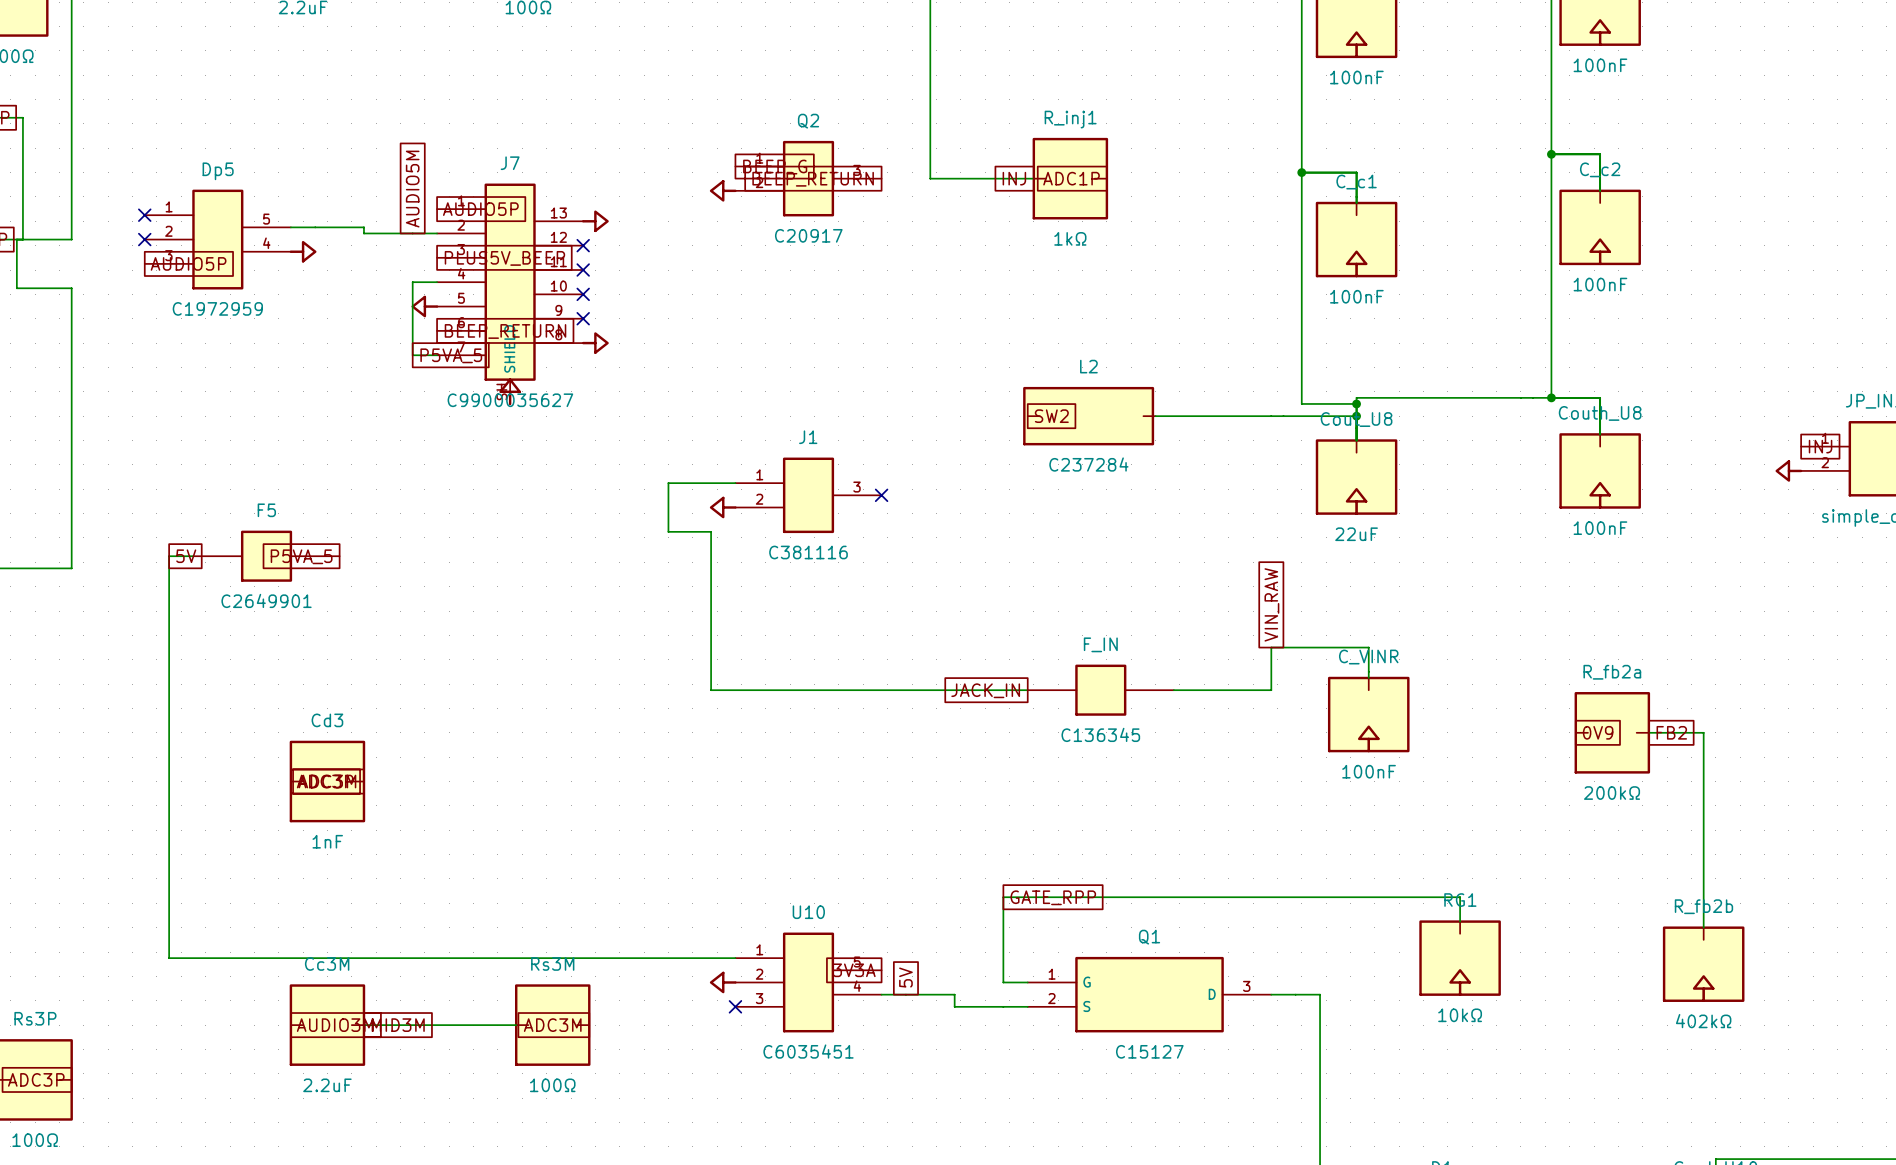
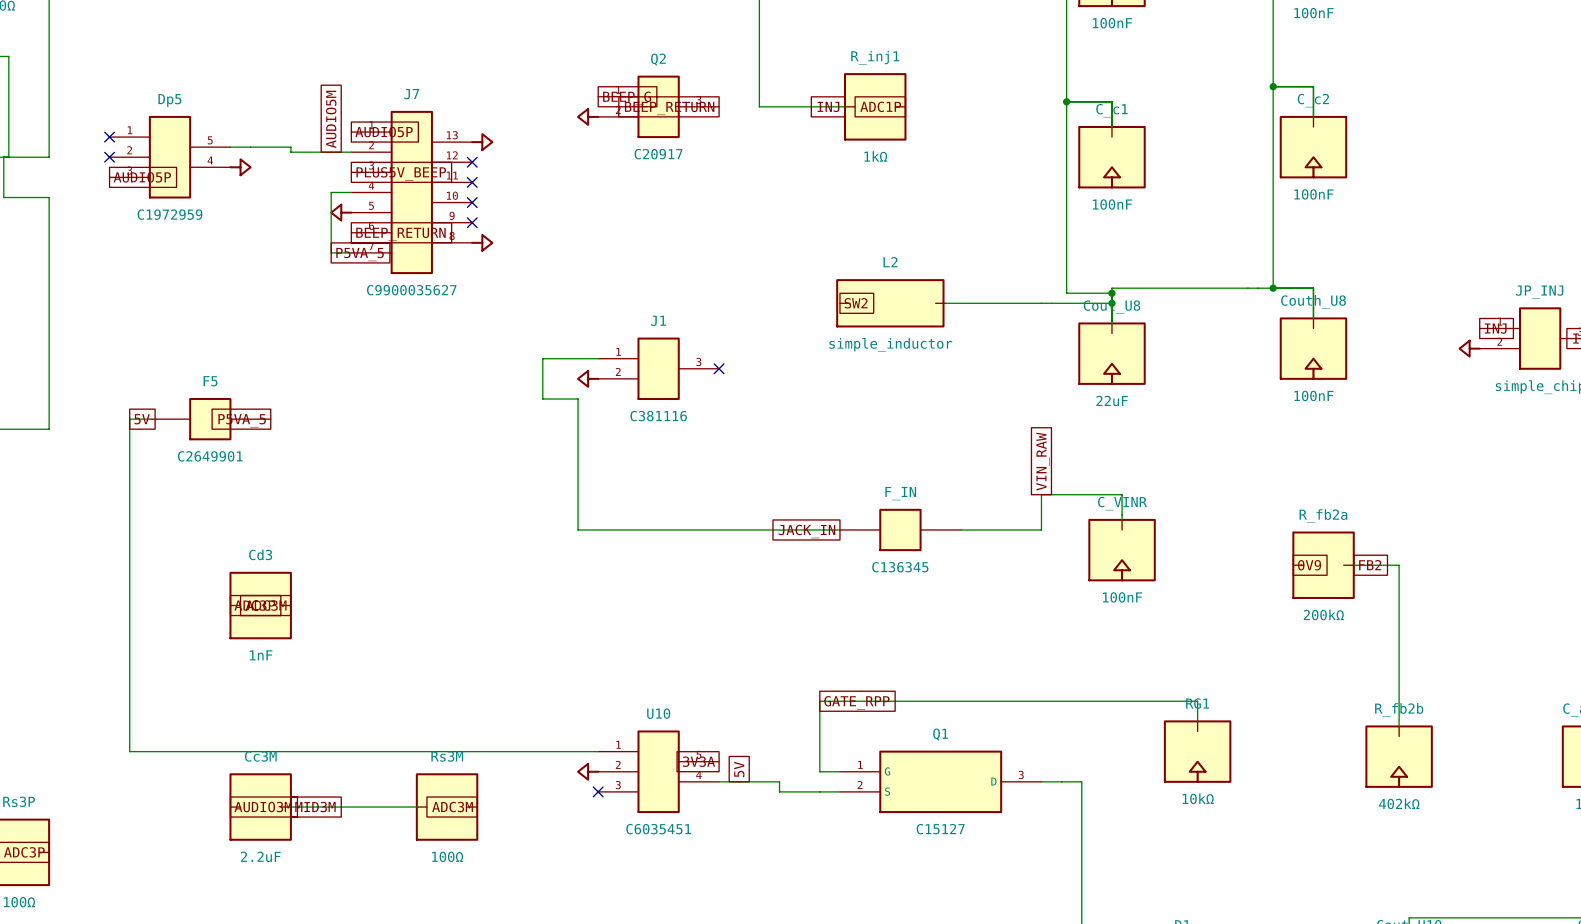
J7 symbol: [437, 183, 584, 404] -> [351, 110, 473, 275]
power symbol: (510, 391) -> none
L2 value: C237284 (1088, 464) -> simple_inductor (890, 344)

